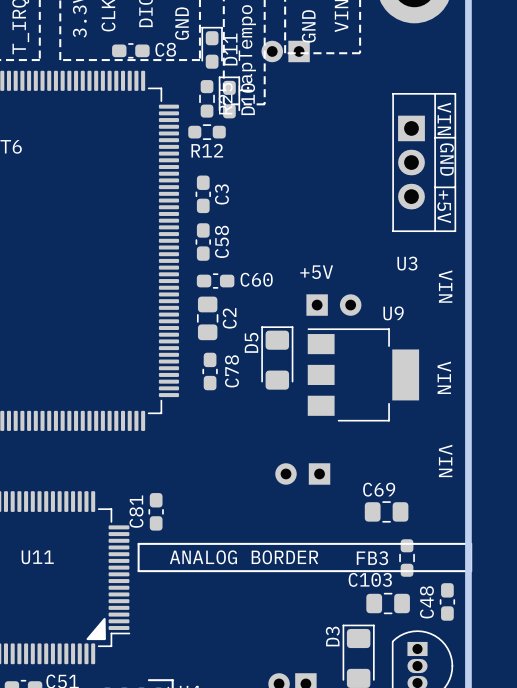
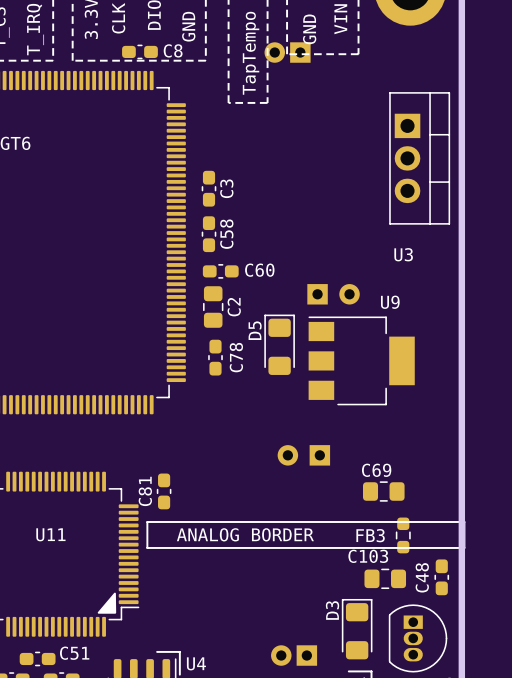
D11: (212, 47) -> none
D10: (229, 97) -> none
part: (207, 98) -> none
text: VIN (444, 118) -> none
R12: (207, 132) -> none
text: GND (446, 159) -> none
text: +5V (444, 206) -> none
text: +5V (316, 272) -> none
text: VIN (445, 286) -> none
text: VIN (444, 377) -> none
text: VIN (445, 460) -> none

